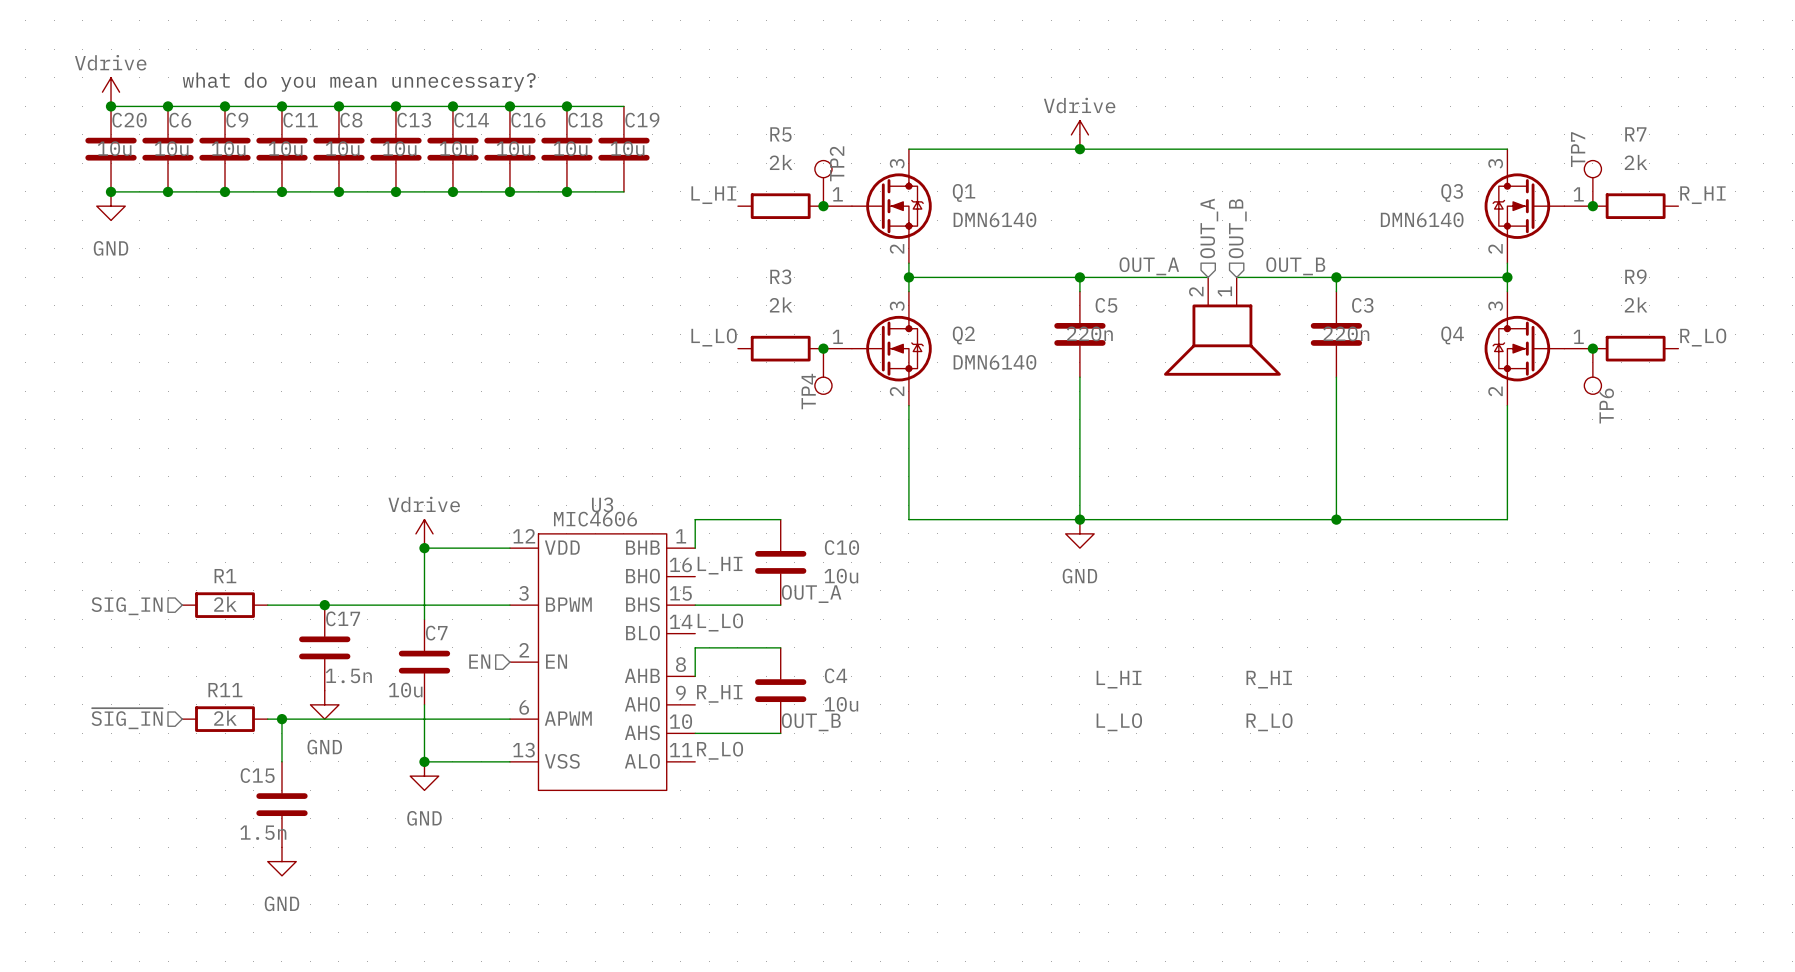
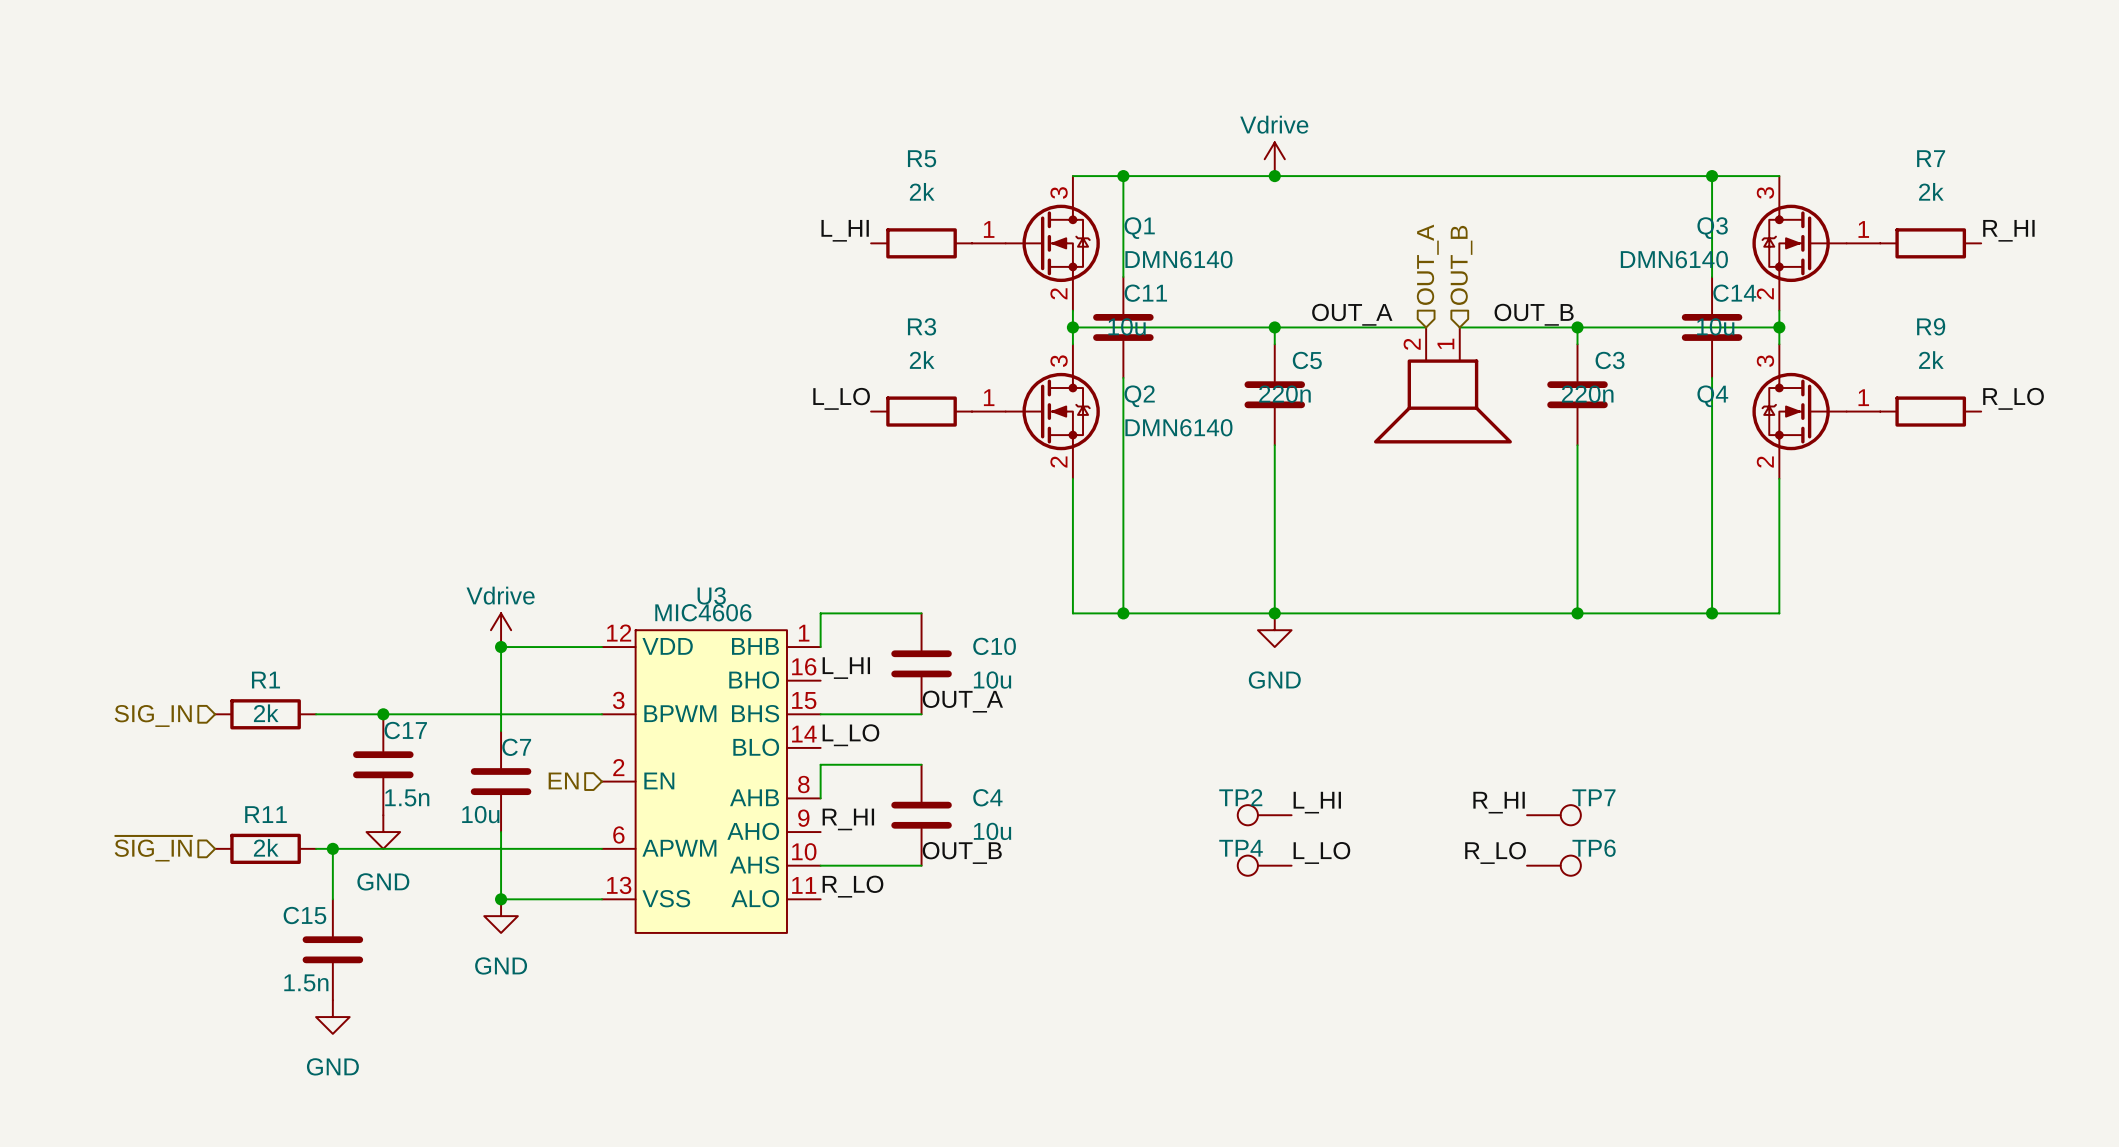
text: what do you mean unnecessary? (359, 82) -> none
power symbol: Vdrive (111, 92) -> none
wire: (111, 106) (623, 106) -> none
junction: (111, 106) -> none
junction: (168, 106) -> none
junction: (225, 106) -> none
junction: (281, 106) -> none
junction: (338, 106) -> none
junction: (395, 106) -> none
junction: (452, 106) -> none
junction: (509, 106) -> none
junction: (566, 106) -> none
C20: 10u (111, 149) -> none
C6: 10u (168, 149) -> none
C9: 10u (225, 149) -> none
C11 position: (281, 149) -> (1123, 327)
C8: 10u (338, 149) -> none
C13: 10u (395, 149) -> none
C14 position: (452, 149) -> (1712, 327)
C16: 10u (509, 149) -> none
C18: 10u (566, 149) -> none
C19: 10u (623, 149) -> none
wire: none -> (1123, 176) (1123, 277)
junction: none -> (1123, 176)
wire: none -> (1712, 176) (1712, 277)
junction: none -> (1712, 176)
TP2 rotation: 0° (823, 169) -> 90° counterclockwise (1247, 815)
TP7 rotation: 0° (1592, 169) -> 90° clockwise (1570, 815)
TP2 position: (823, 183) -> (1264, 815)
TP7 position: (1592, 183) -> (1553, 815)
wire: (111, 191) (623, 191) -> none
junction: (111, 191) -> none
junction: (168, 191) -> none
junction: (225, 191) -> none
junction: (281, 191) -> none
junction: (338, 191) -> none
junction: (395, 191) -> none
junction: (452, 191) -> none
junction: (509, 191) -> none
junction: (566, 191) -> none
power symbol: GND (111, 206) -> none
junction: (823, 206) -> none
junction: (1592, 206) -> none
wire: none -> (1123, 377) (1123, 613)
wire: none -> (1712, 377) (1712, 613)
junction: (823, 348) -> none
junction: (1592, 348) -> none
TP4 position: (823, 371) -> (1264, 865)
TP6 position: (1592, 371) -> (1553, 865)
TP4 rotation: 0° (823, 385) -> 90° clockwise (1247, 865)
TP6 rotation: 0° (1592, 385) -> 90° counterclockwise (1570, 865)
junction: none -> (1123, 613)
junction: none -> (1712, 613)

